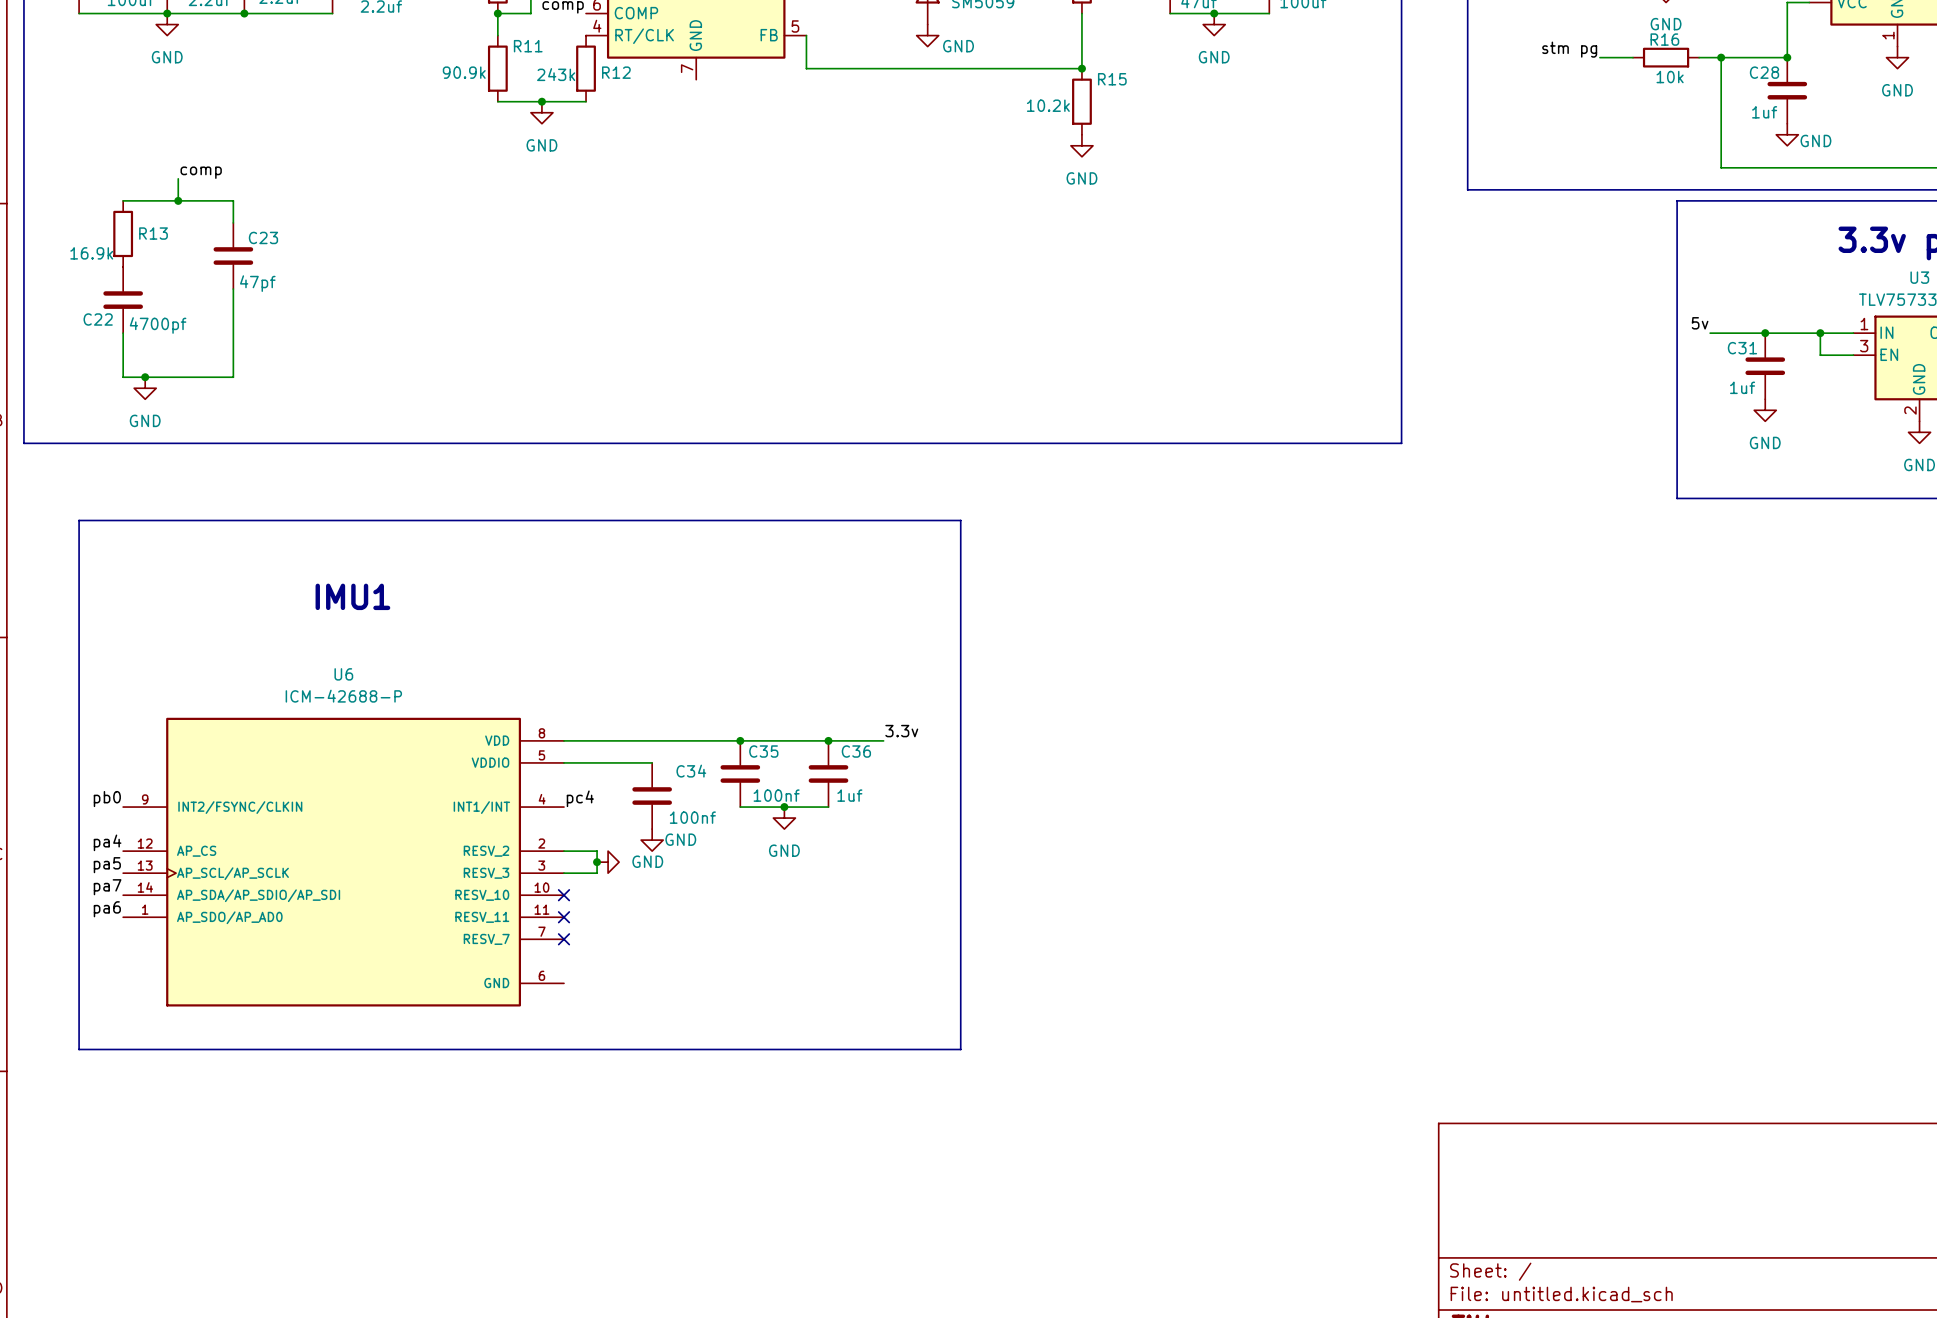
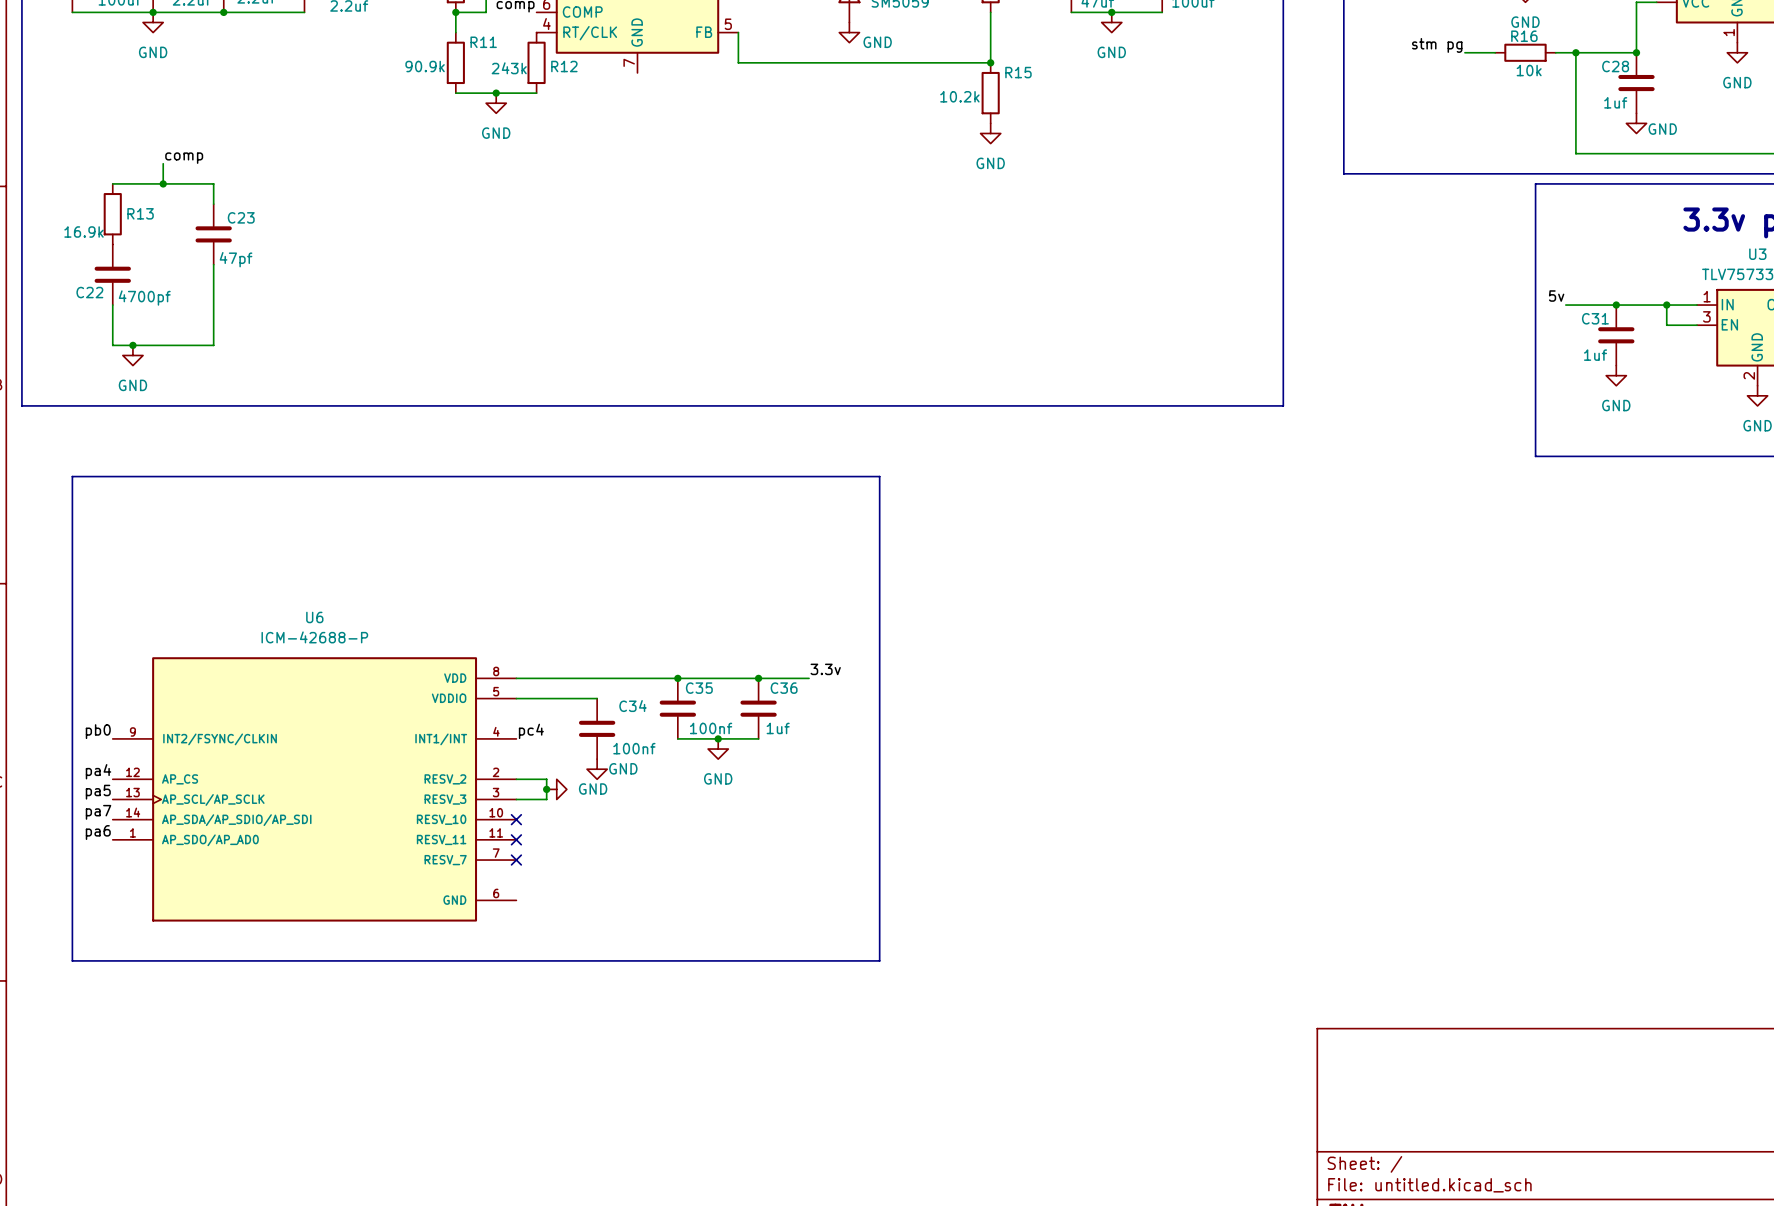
text: IMU1 (352, 596) -> none

